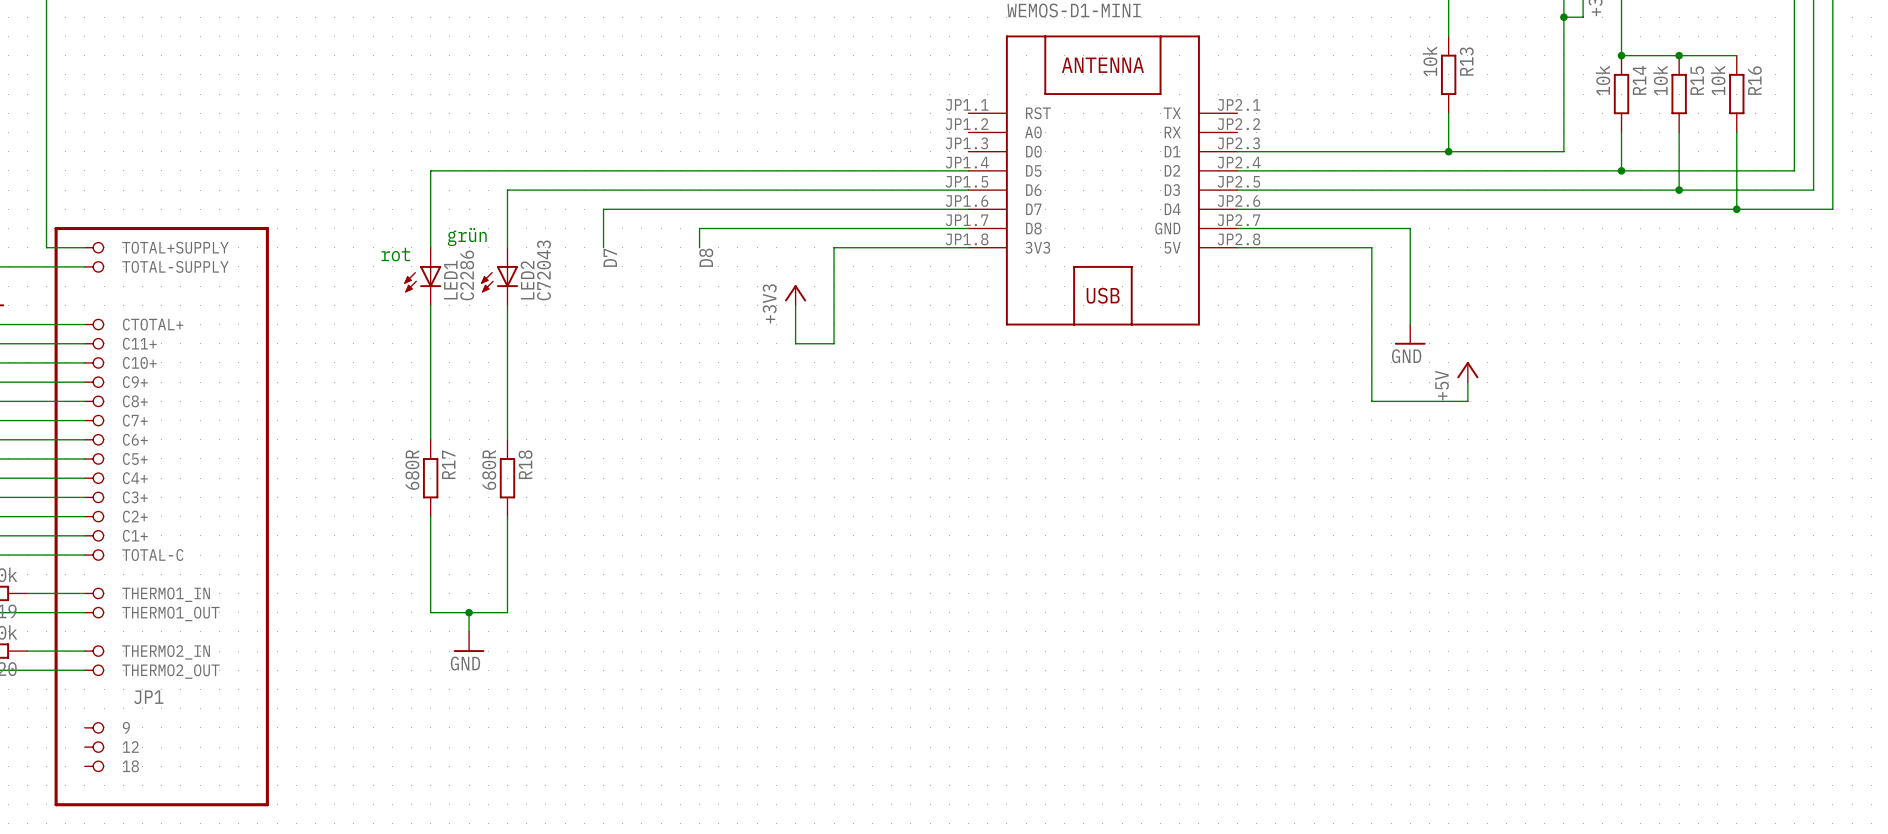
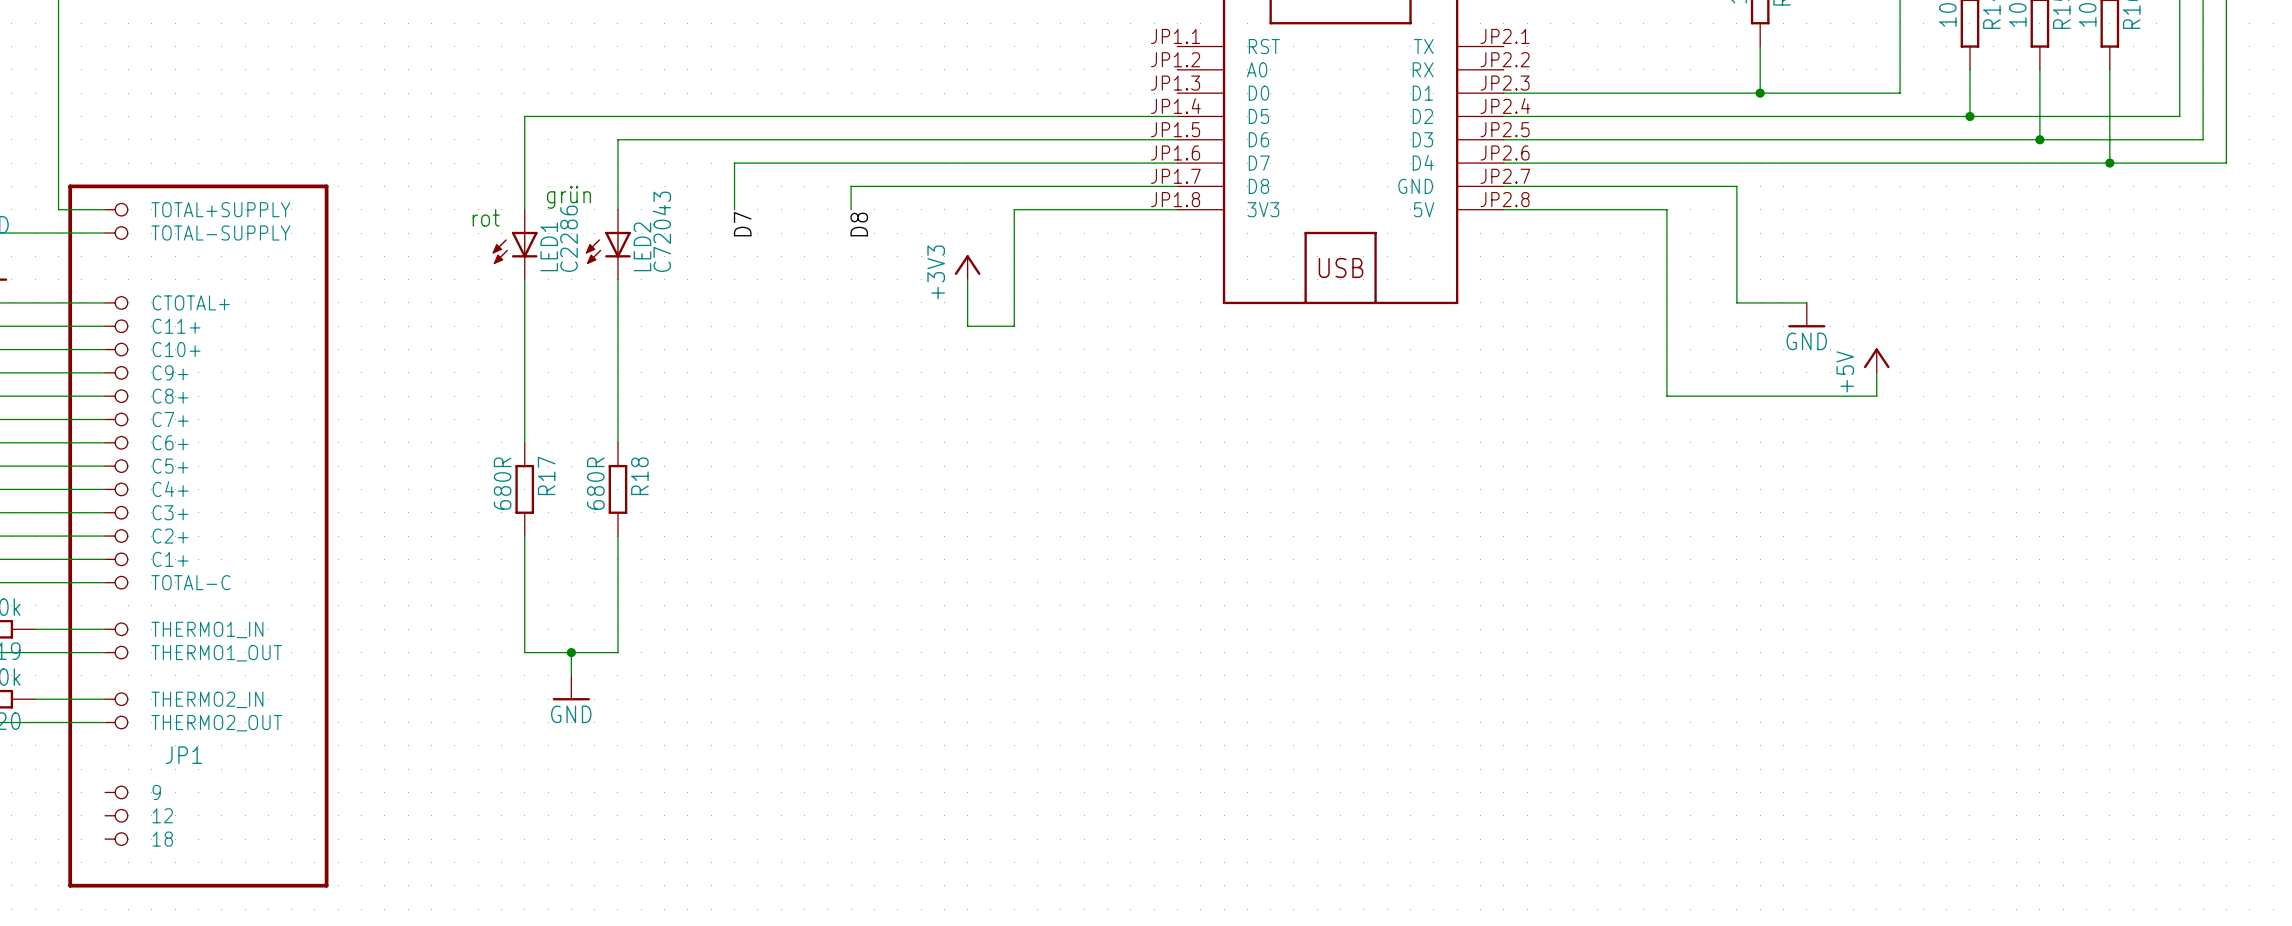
wire: (1410, 228) (1410, 324) -> (1713, 186) (1736, 186) (1736, 302) (1806, 302)
power symbol position: GND (1410, 334) -> GND (1806, 315)
power symbol position: +5V (1467, 372) -> +5V (1876, 360)
wire: (1467, 382) (1467, 401) -> (1876, 372) (1876, 396) (1783, 396)

